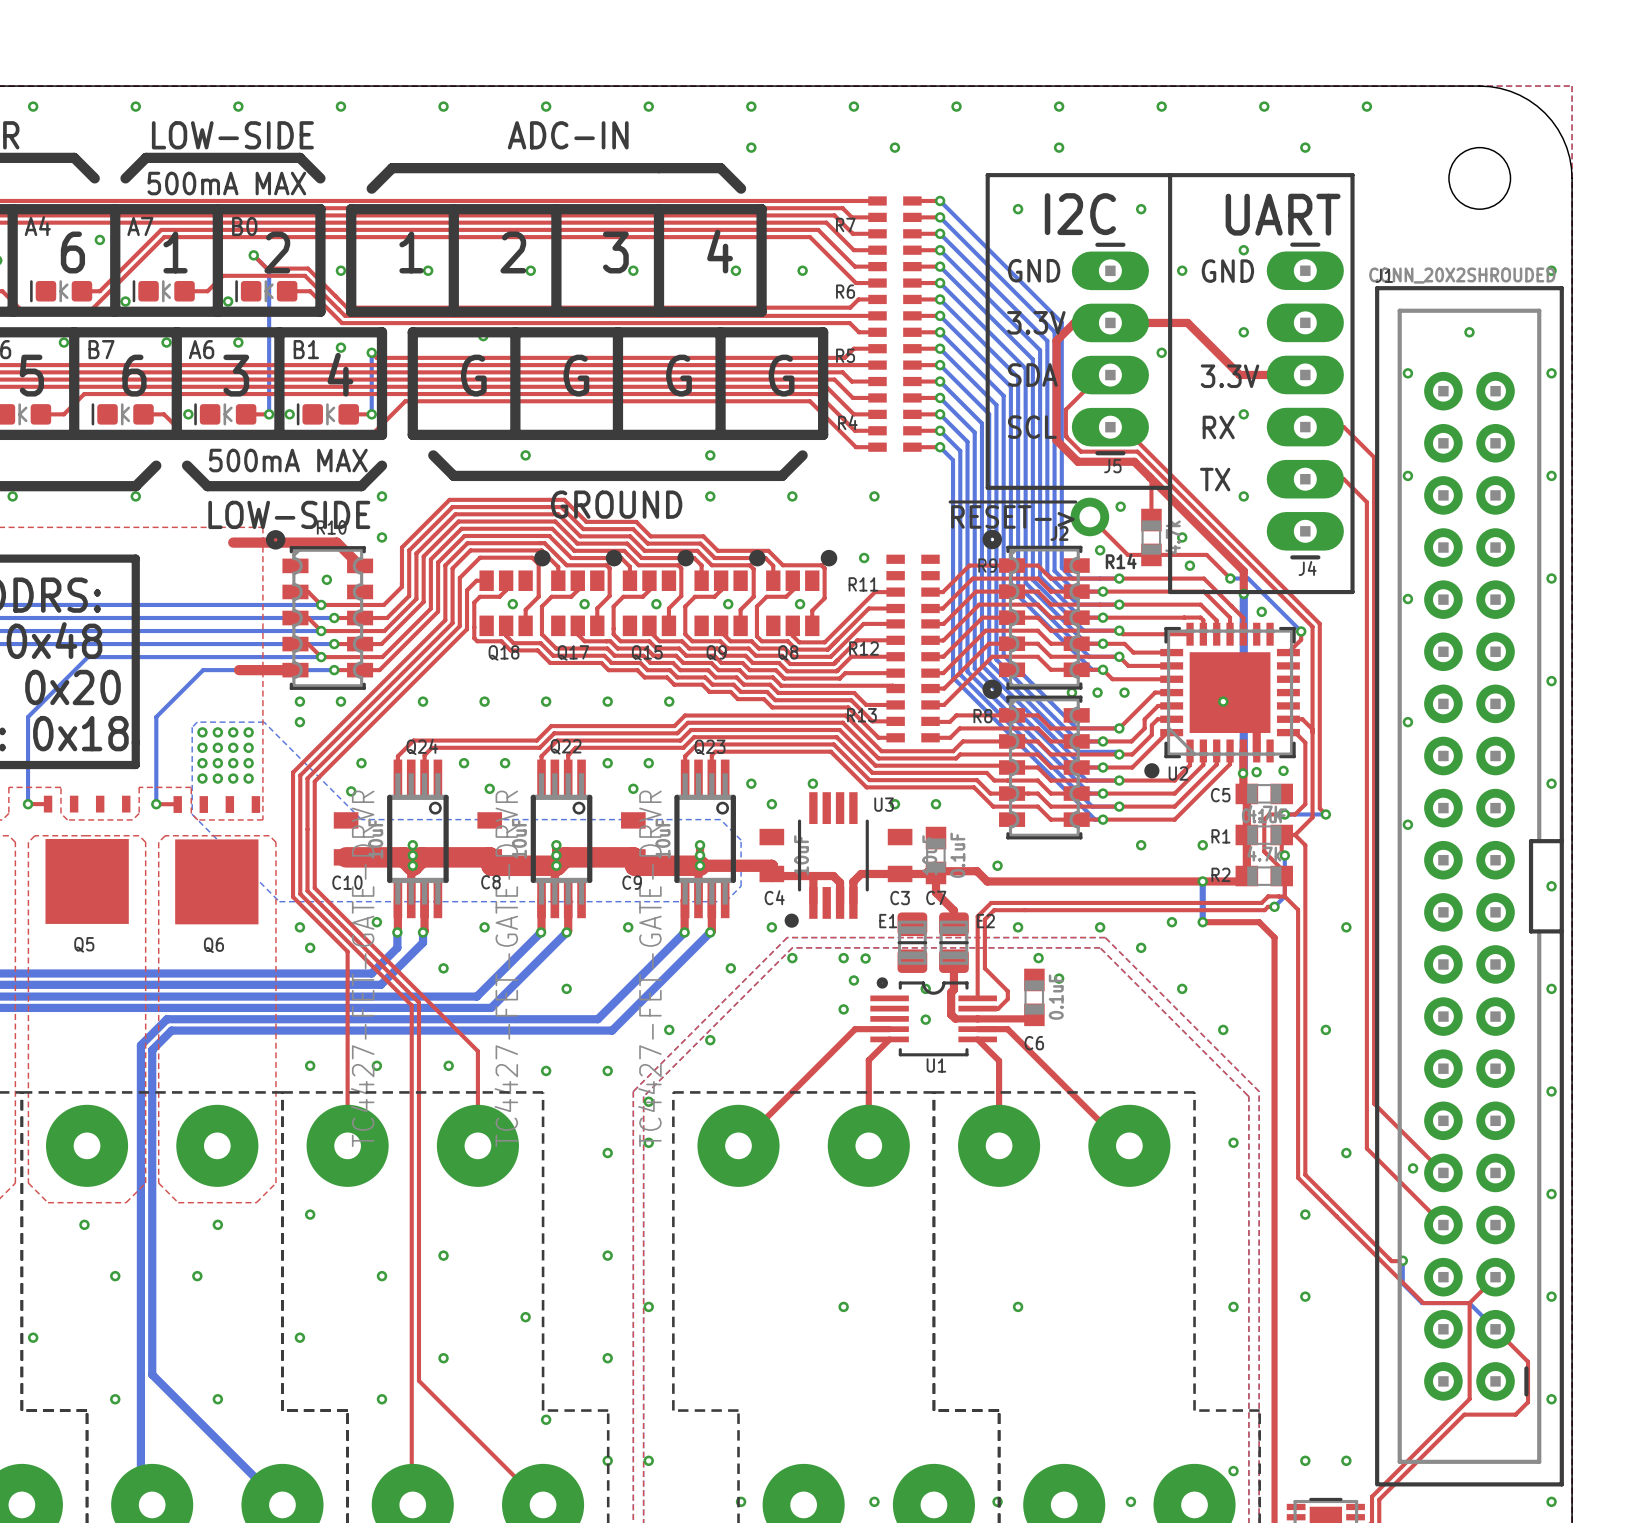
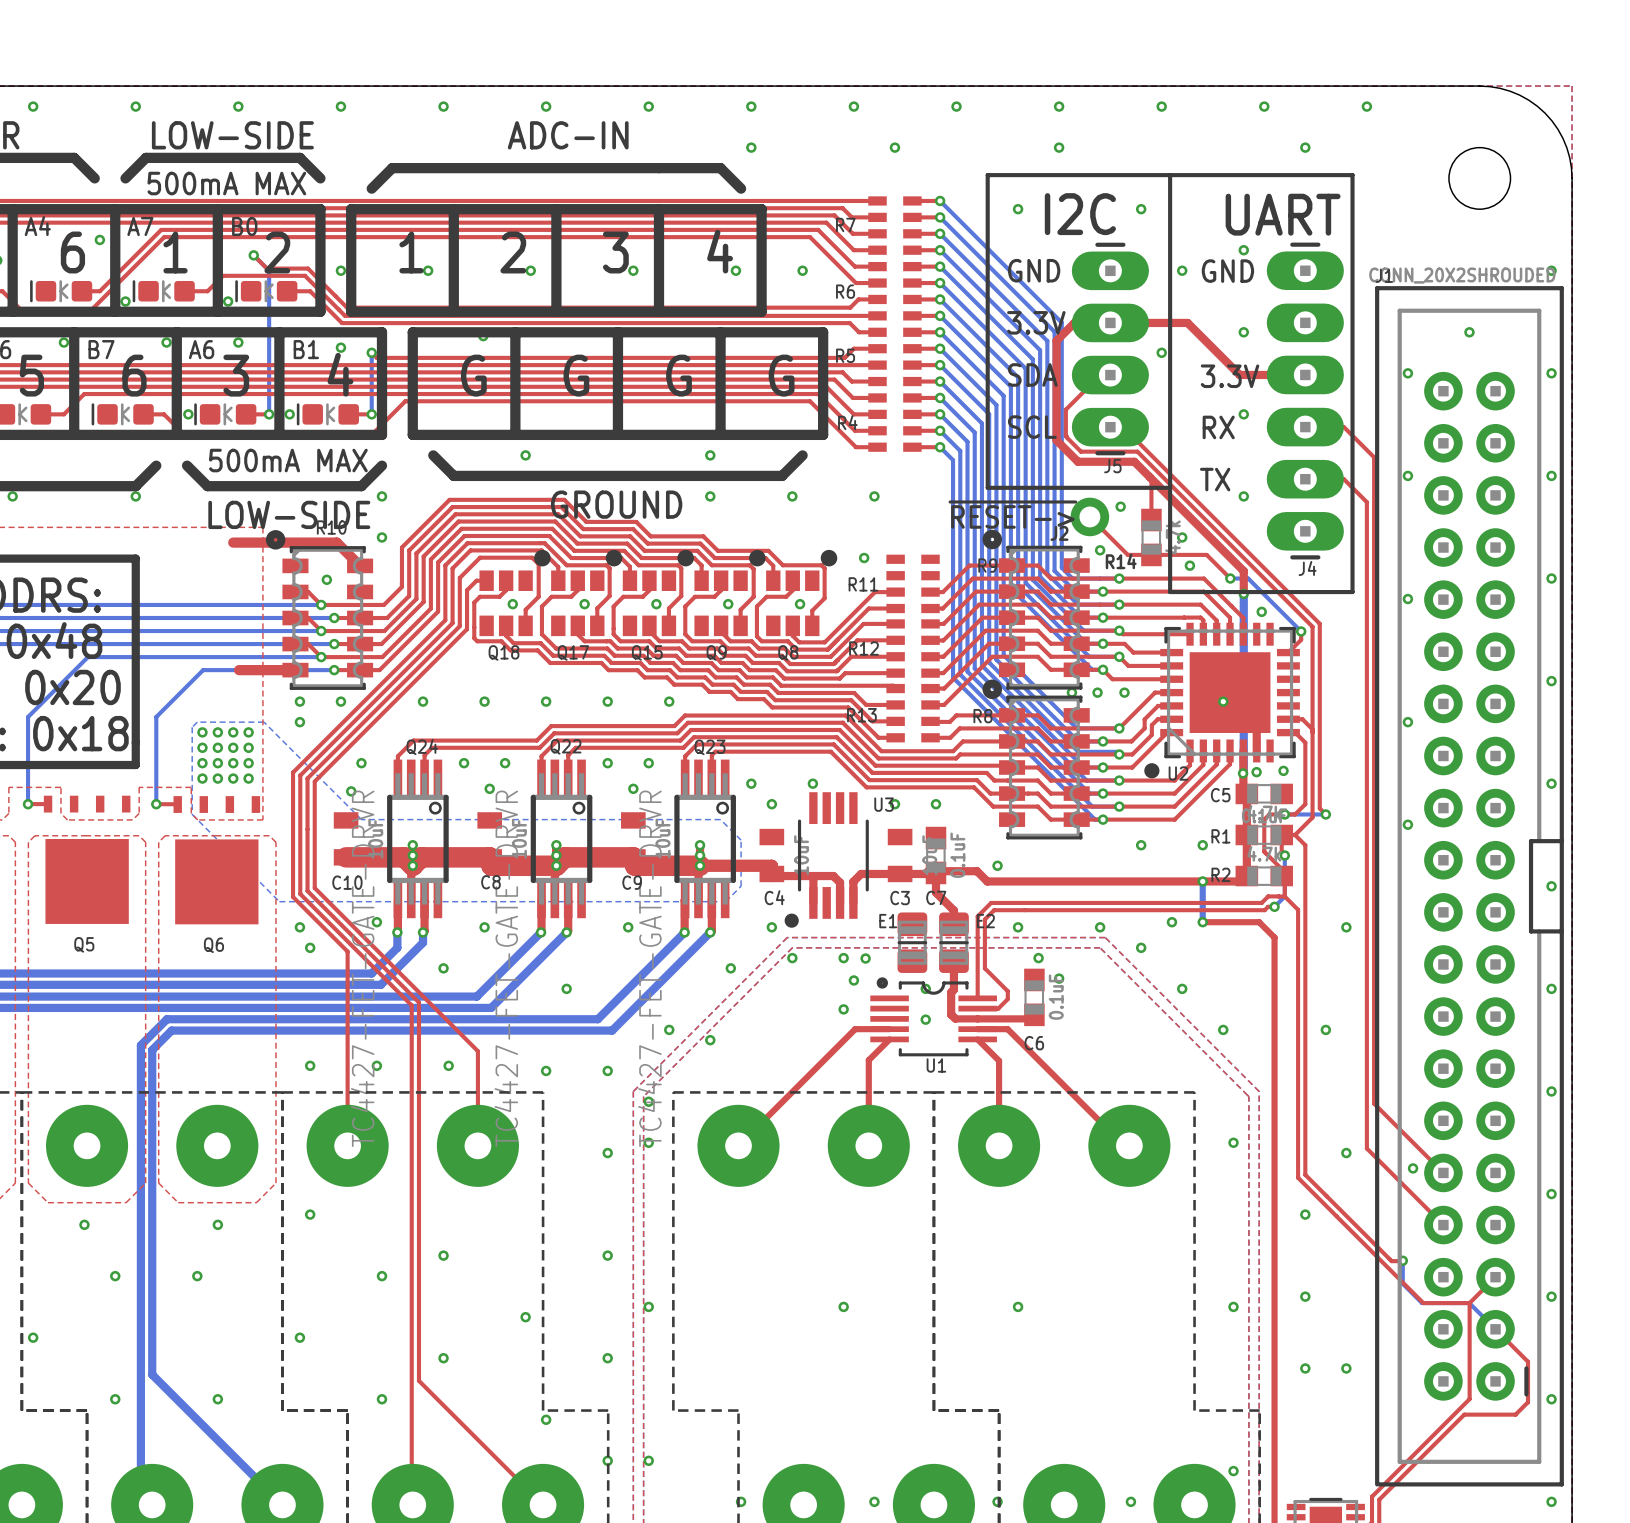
via: none -> (1305, 1368)
via: none -> (1346, 1368)
via: (1305, 1460) -> none
via: (1346, 1460) -> none

